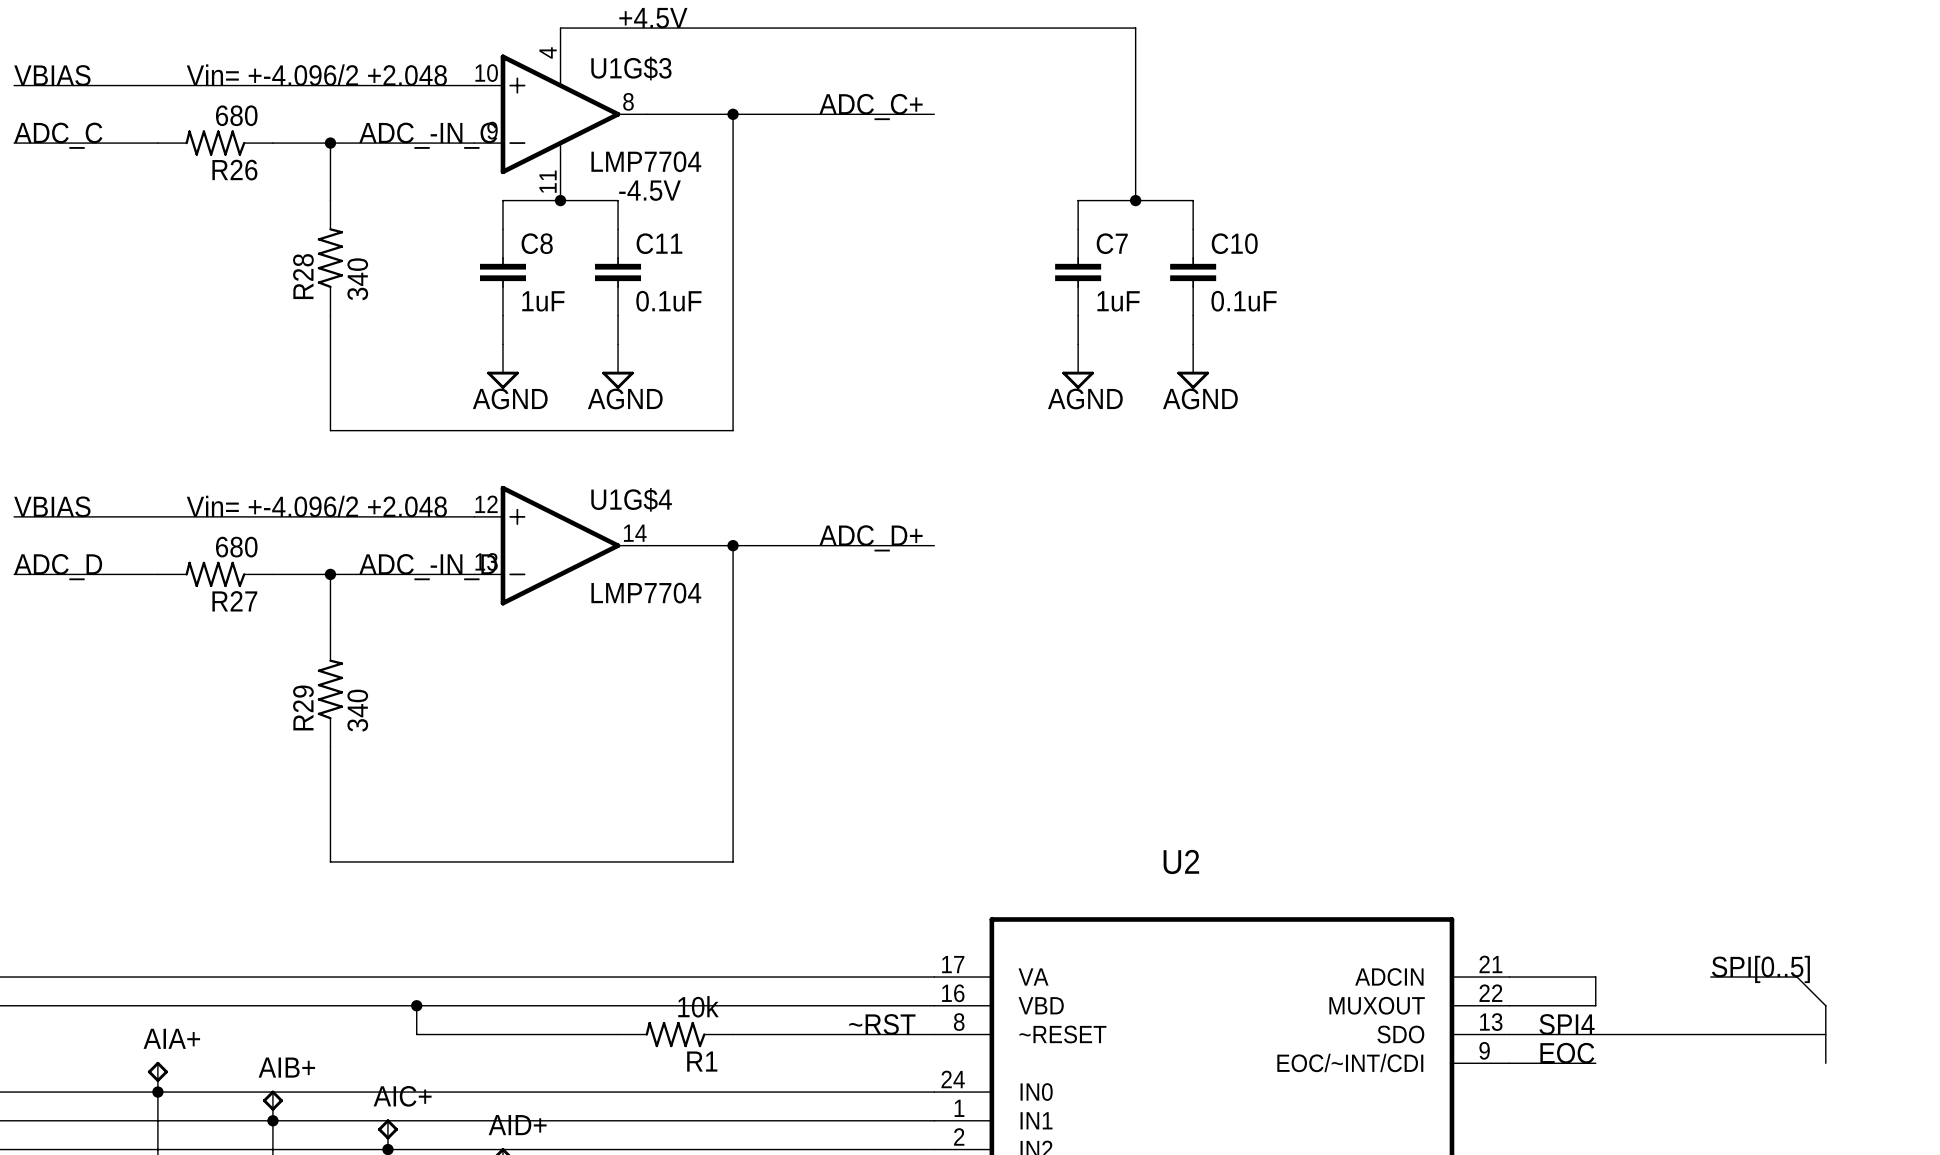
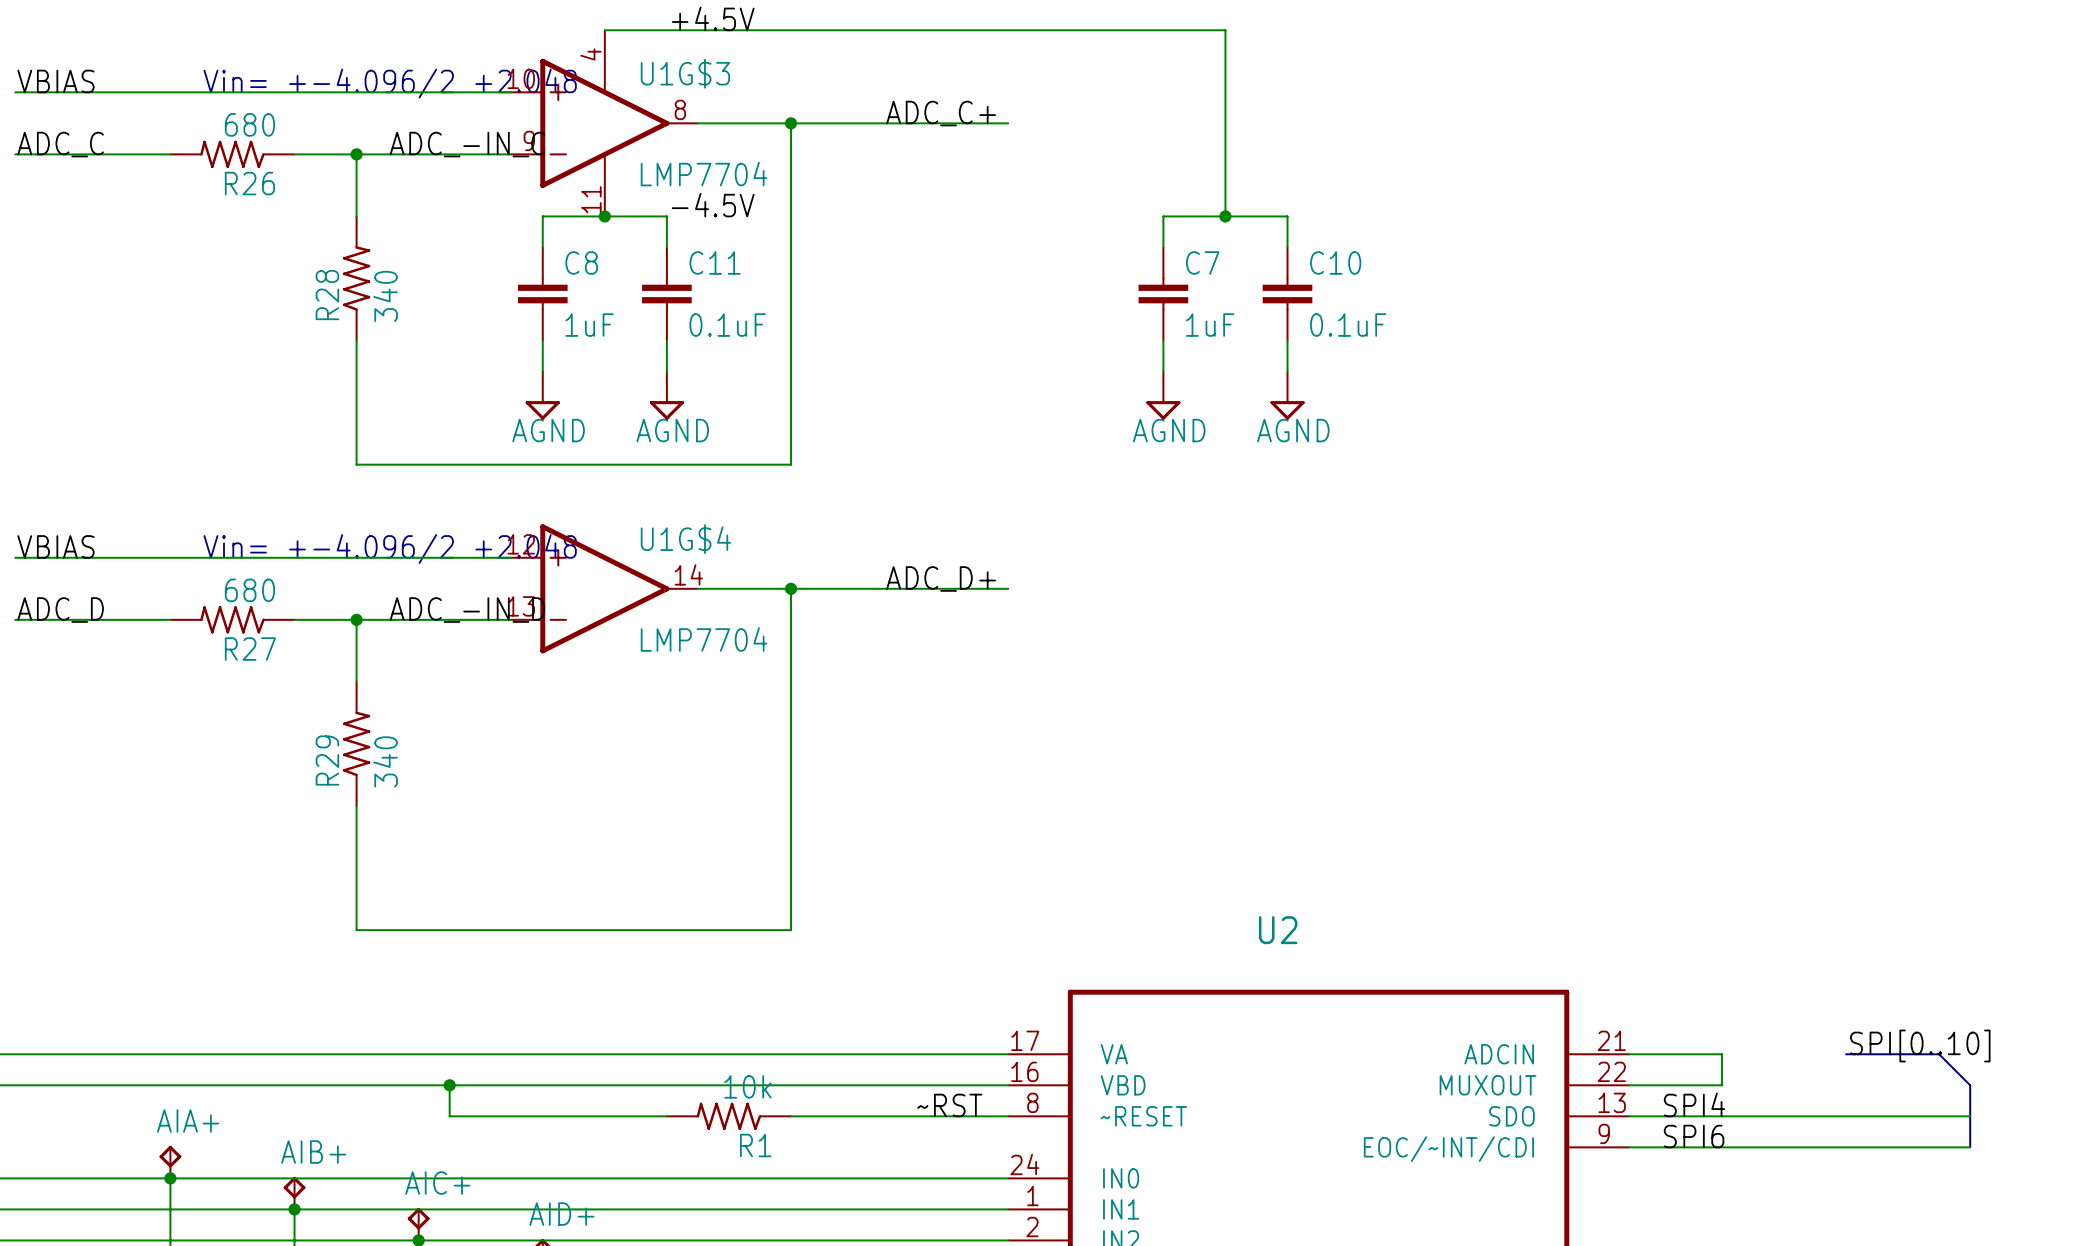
label: SPI[0..5] (1760, 969) -> SPI[0..10] (1920, 1045)
label: EOC (1567, 1053) -> SPI6 (1694, 1136)
wire: none -> (1721, 1147) (1970, 1147)

